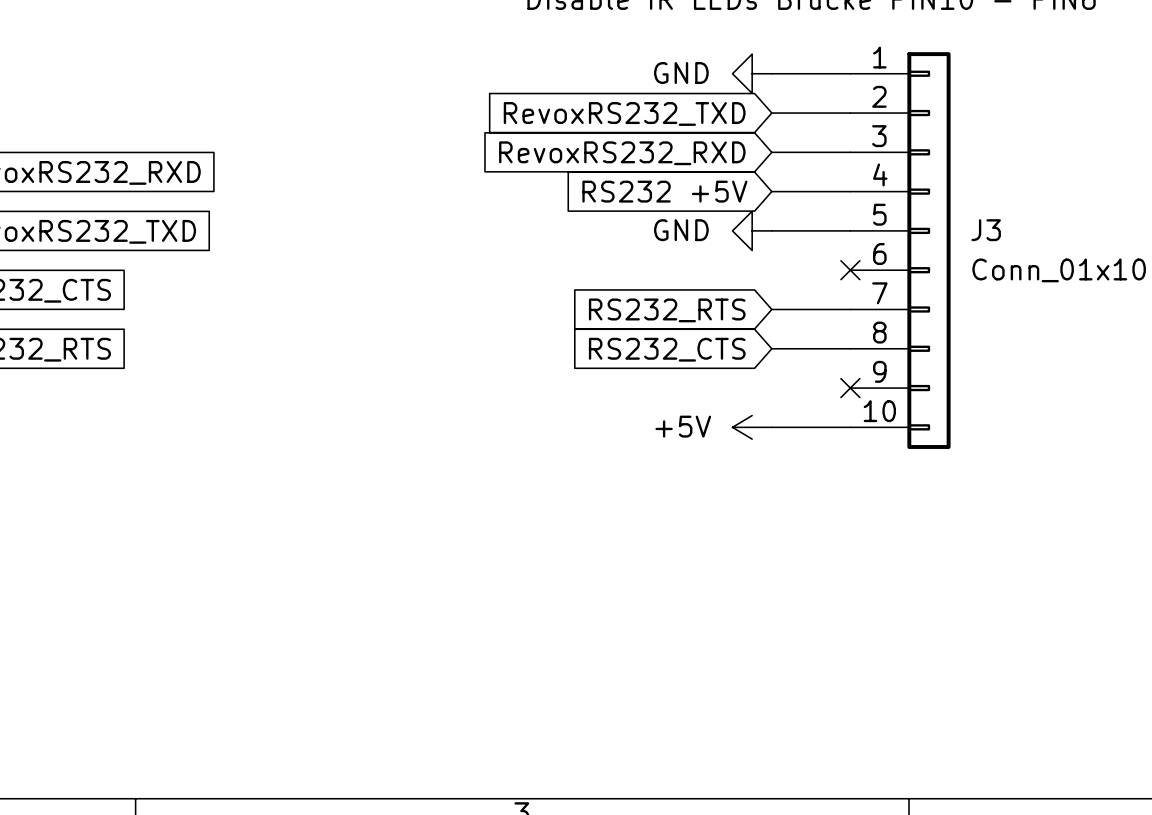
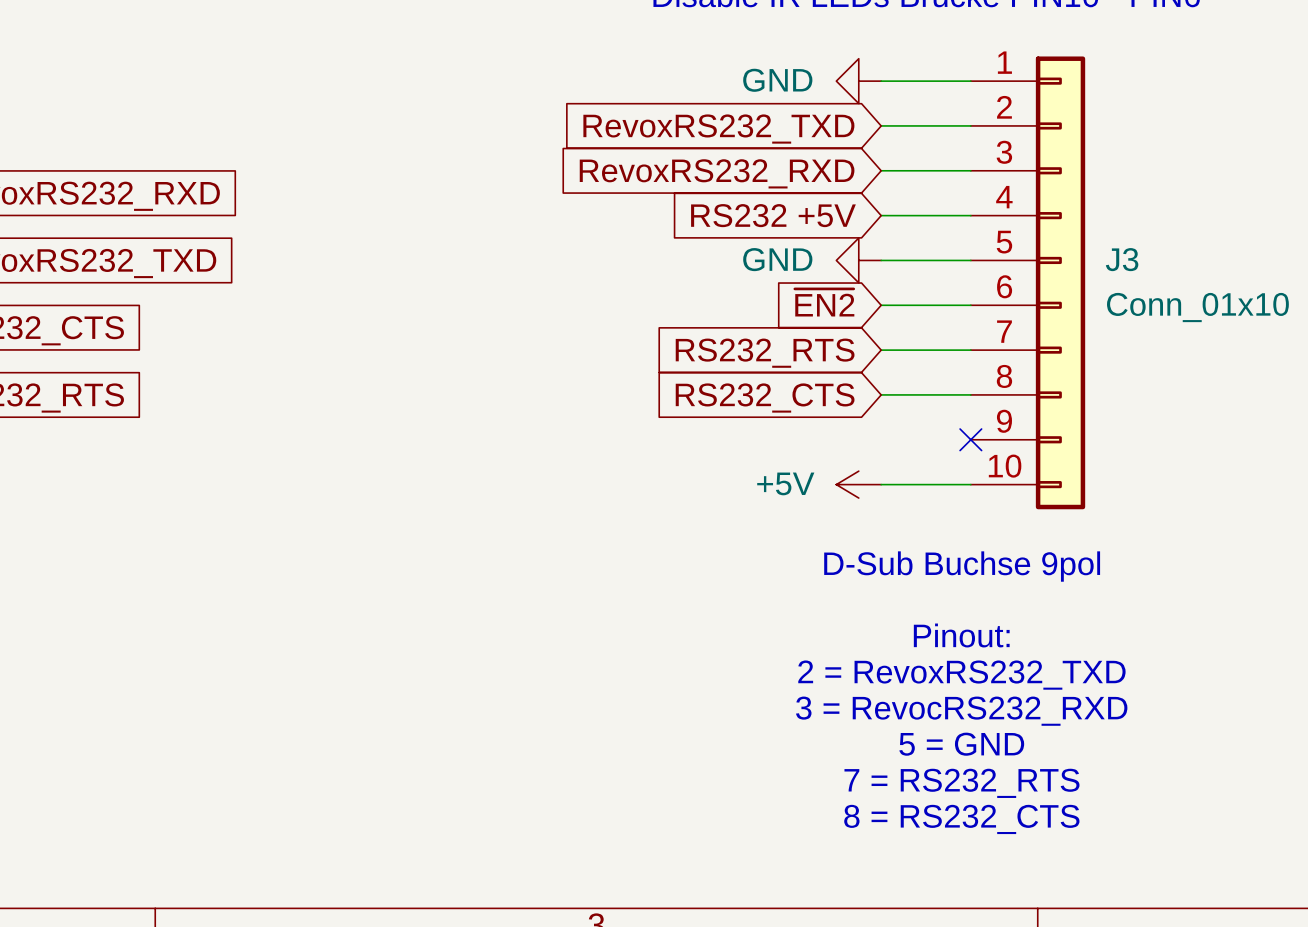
global label: none -> ~{EN2} (824, 302)
wire: none -> (881, 305) (970, 305)
no-connect mark: (850, 270) -> none
text: none -> D-Sub Buchse 9pol (962, 566)
text: none -> Pinout: (961, 635)
text: none -> 2 = RevoxRS232_TXD (961, 675)
text: none -> 3 = RevocRS232_RXD (961, 711)
text: none -> 5 = GND (961, 744)
text: none -> 7 = RS232_RTS (961, 783)
text: none -> 8 = RS232_CTS (961, 819)

